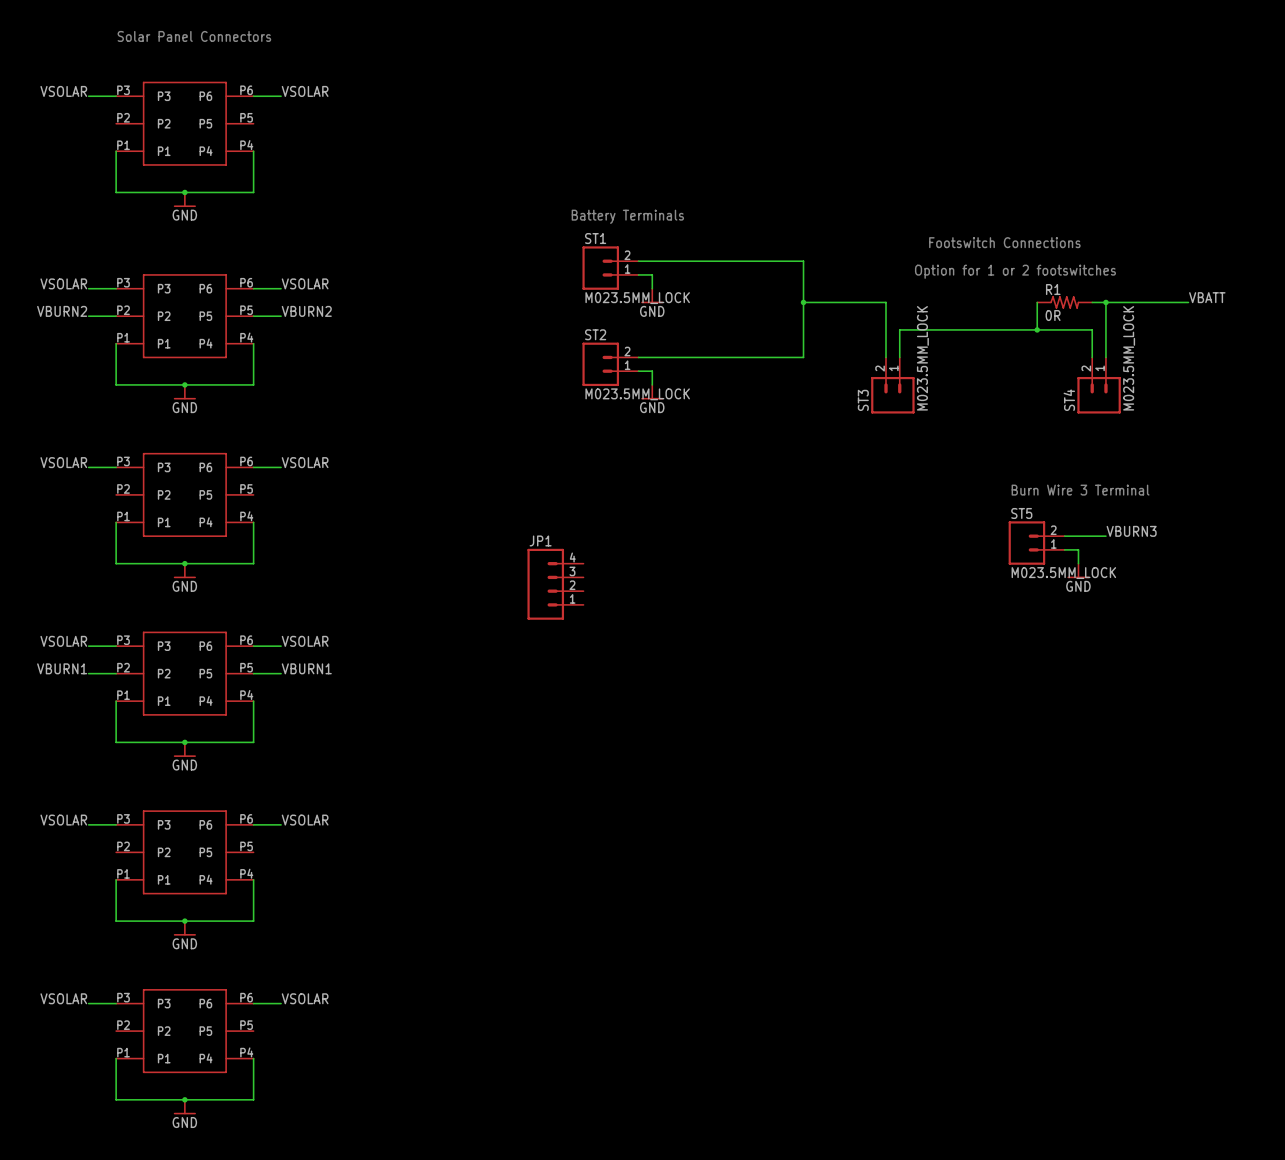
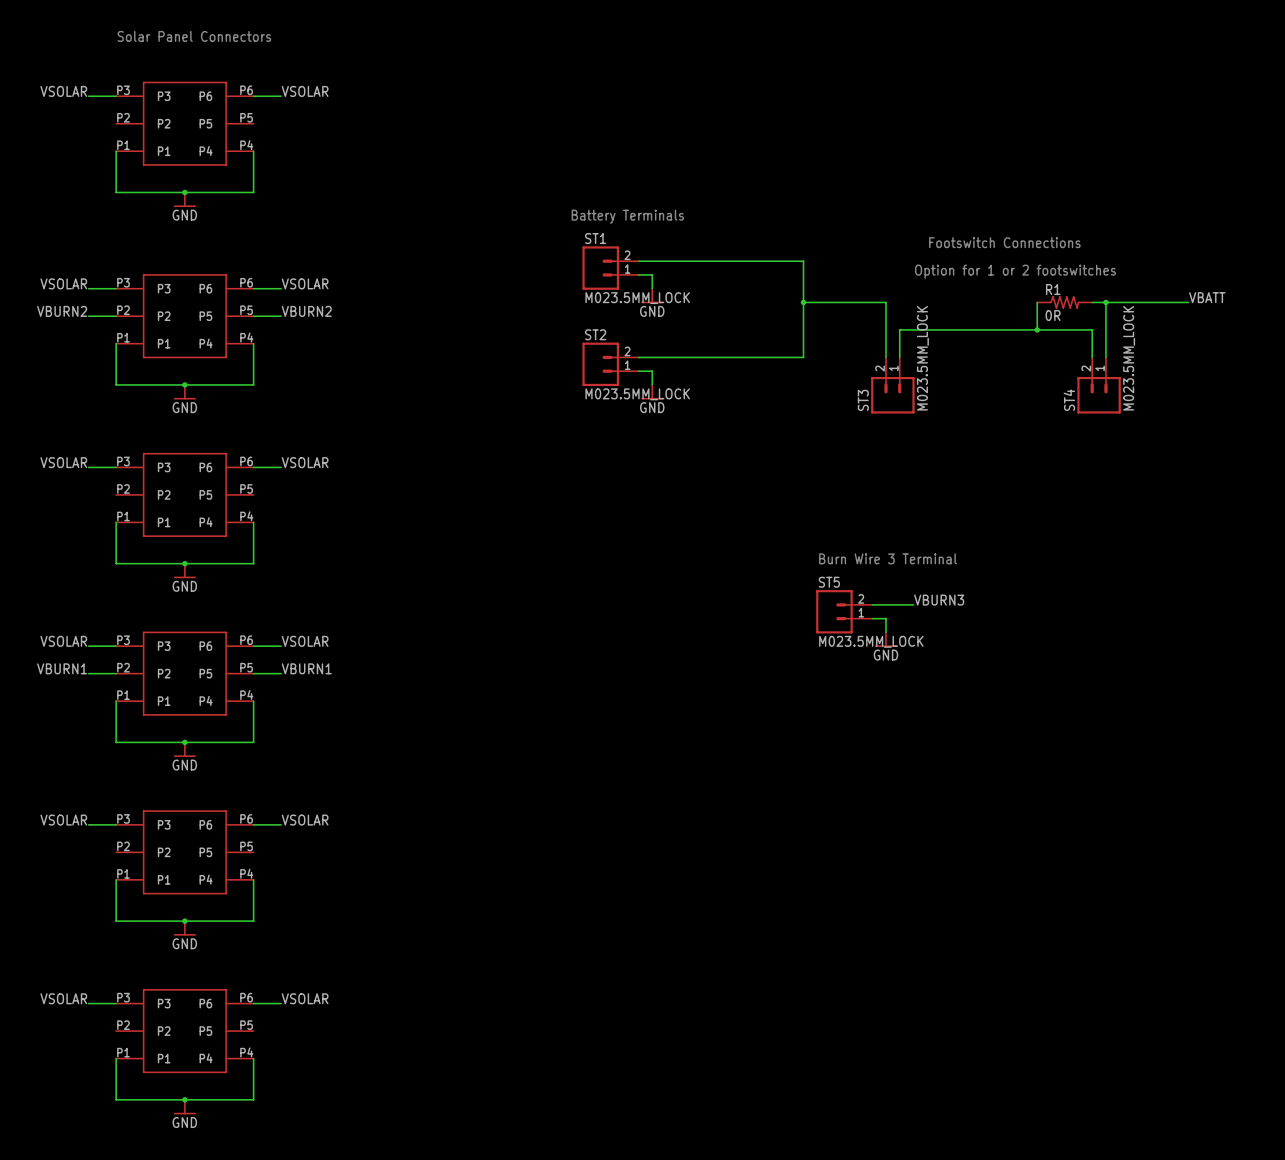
text: Burn Wire 3 Terminal (1080, 490) -> none
label: VBURN3 (1131, 531) -> none
wire: (1064, 536) (1105, 536) -> none
ST5 position: (1036, 543) -> (844, 611)
wire: (1064, 549) (1078, 549) (1078, 563) -> none
text: none -> Burn Wire 3 Terminal (888, 558)
power symbol: GND (1078, 570) -> none
JP1: (555, 584) -> none
label: none -> VBURN3 (939, 600)
wire: none -> (872, 604) (913, 604)
wire: none -> (872, 618) (886, 618) (886, 632)
power symbol: none -> GND (886, 639)

